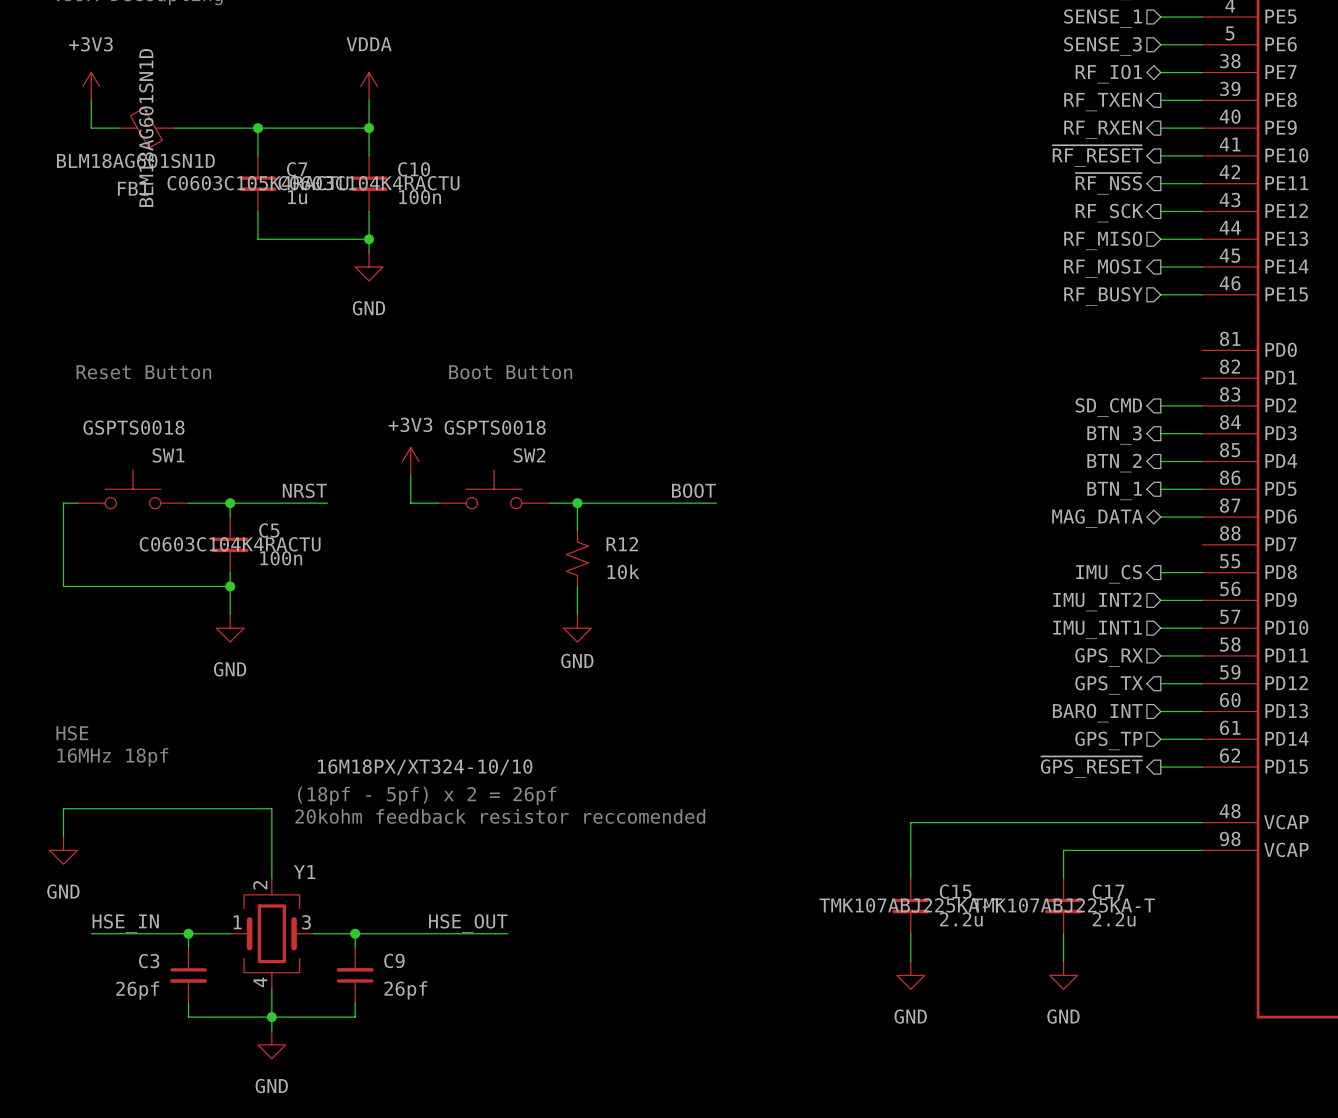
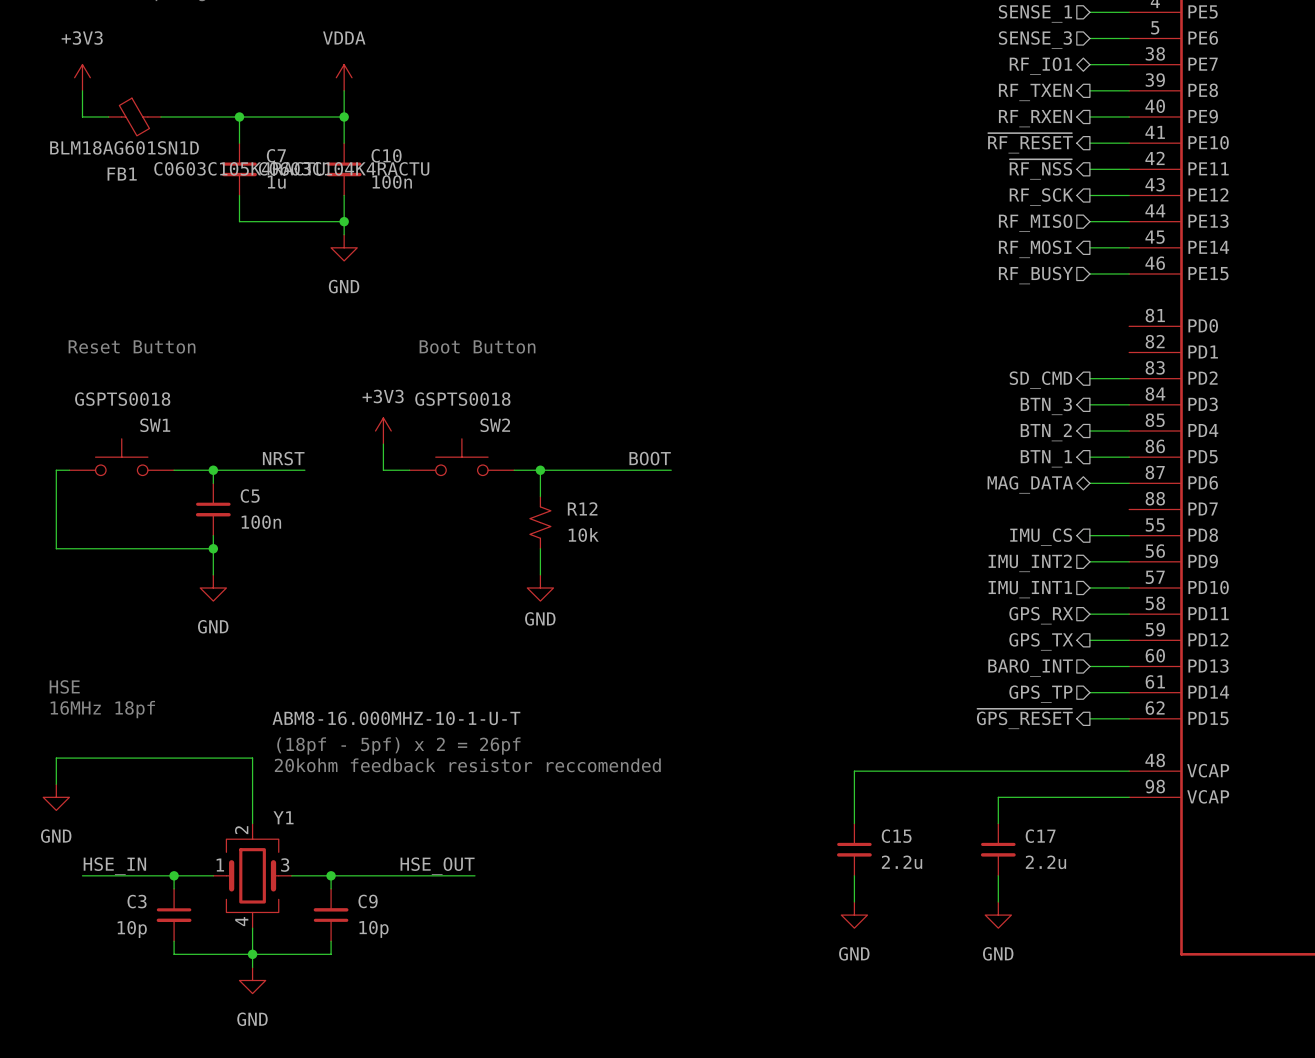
FB1 text: BLM18AG601SN1D (146, 127) -> none
C5 text: C0603C104K4RACTU (230, 544) -> none
Y1 value: 16M18PX/XT324-10/10 (425, 767) -> ABM8-16.000MHZ-10-1-U-T (396, 718)
C15 text: TMK107ABJ225KA-T (910, 905) -> none
C17 text: TMK107ABJ225KA-T (1063, 905) -> none
C3 value: 26pf (137, 990) -> 10p (132, 929)
C9 value: 26pf (405, 990) -> 10p (373, 929)

